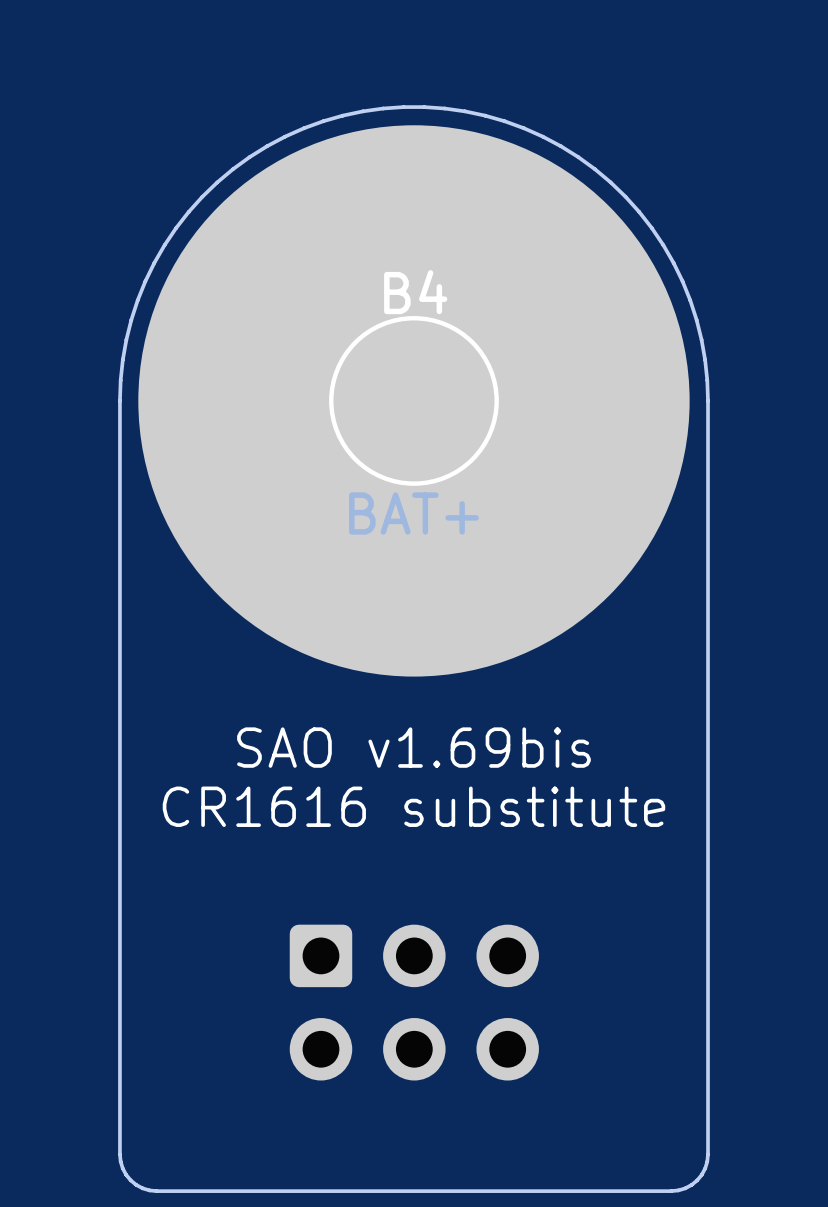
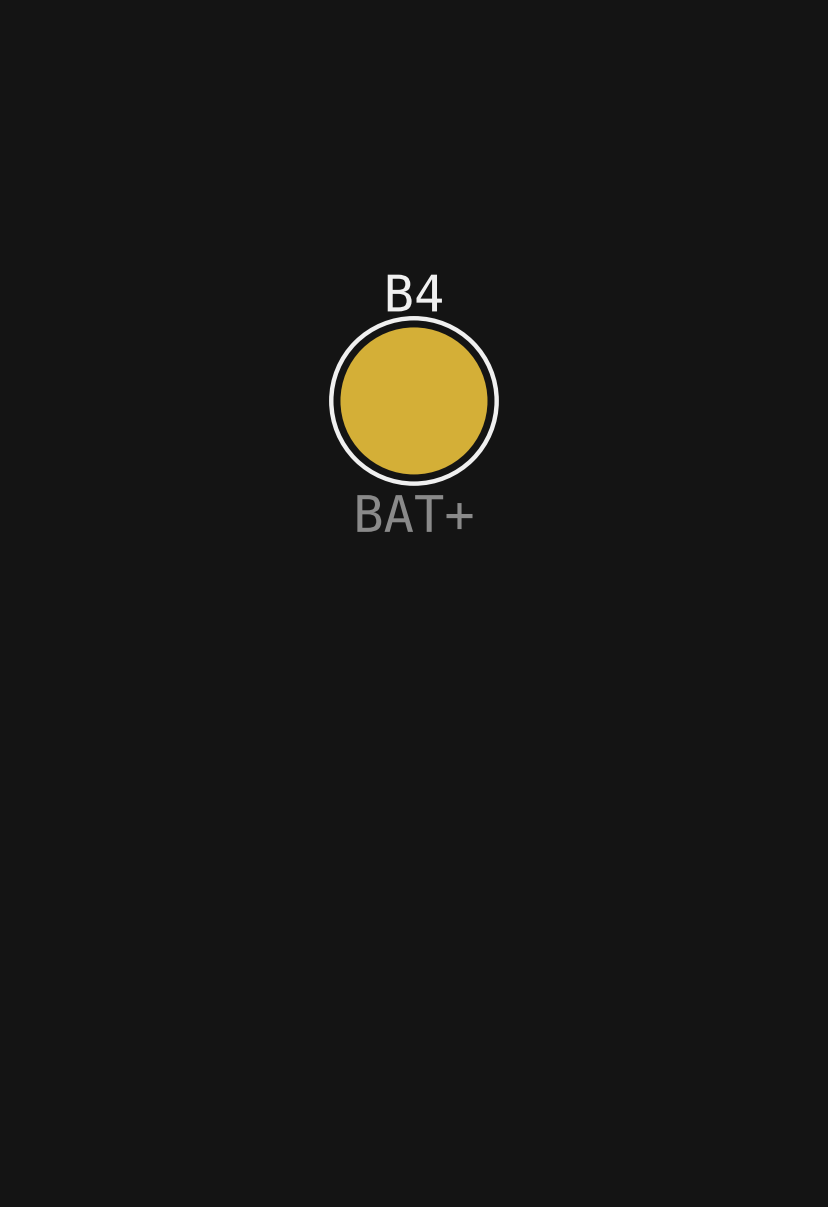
board edge: (403, 107) (342, 115) (303, 128) (266, 146) (232, 169) (188, 211) (164, 245) (145, 281) (131, 319) (122, 360) (119, 400) (120, 1161) (130, 1180) (142, 1188) (156, 1191) (678, 1190) (697, 1180) (705, 1168) (708, 1154) (708, 400) (705, 360) (696, 319) (673, 262) (651, 228) (610, 182) (578, 157) (524, 128) (485, 115) (444, 108) (403, 107) -> none
part: (413, 400) -> none
text: SAO v1.69bis (413, 747) -> none
text: CR1616 substitute (413, 806) -> none
part: (414, 1002) -> none

